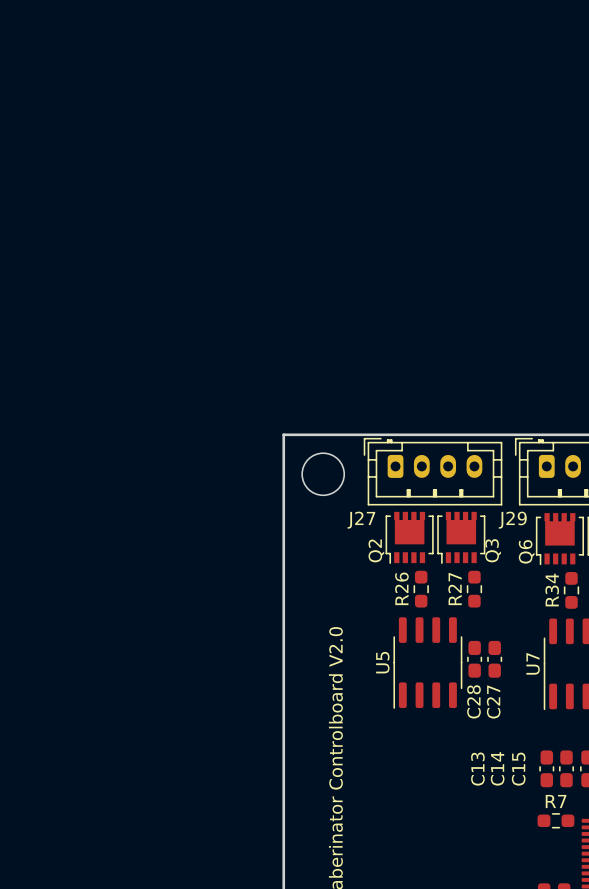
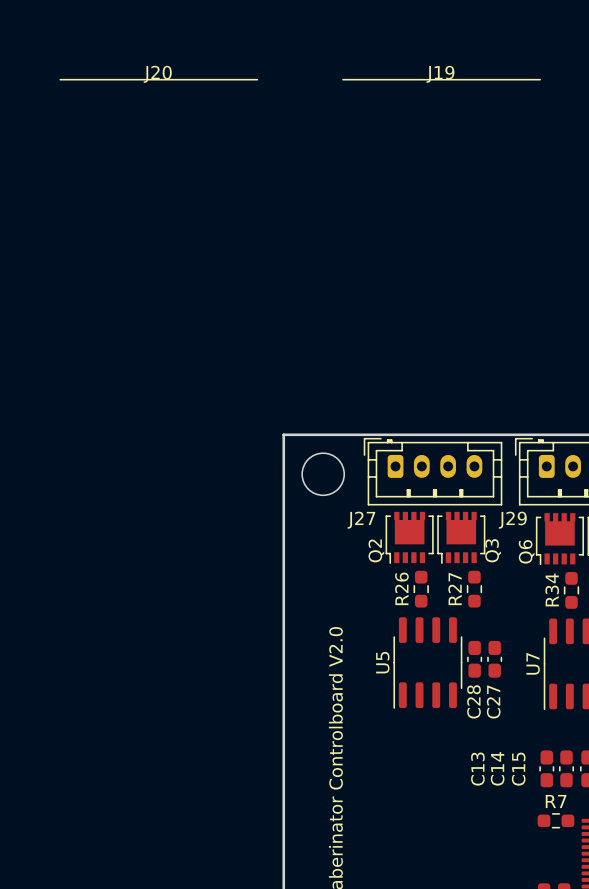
J20: none -> (158, 79)
J19: none -> (441, 79)

